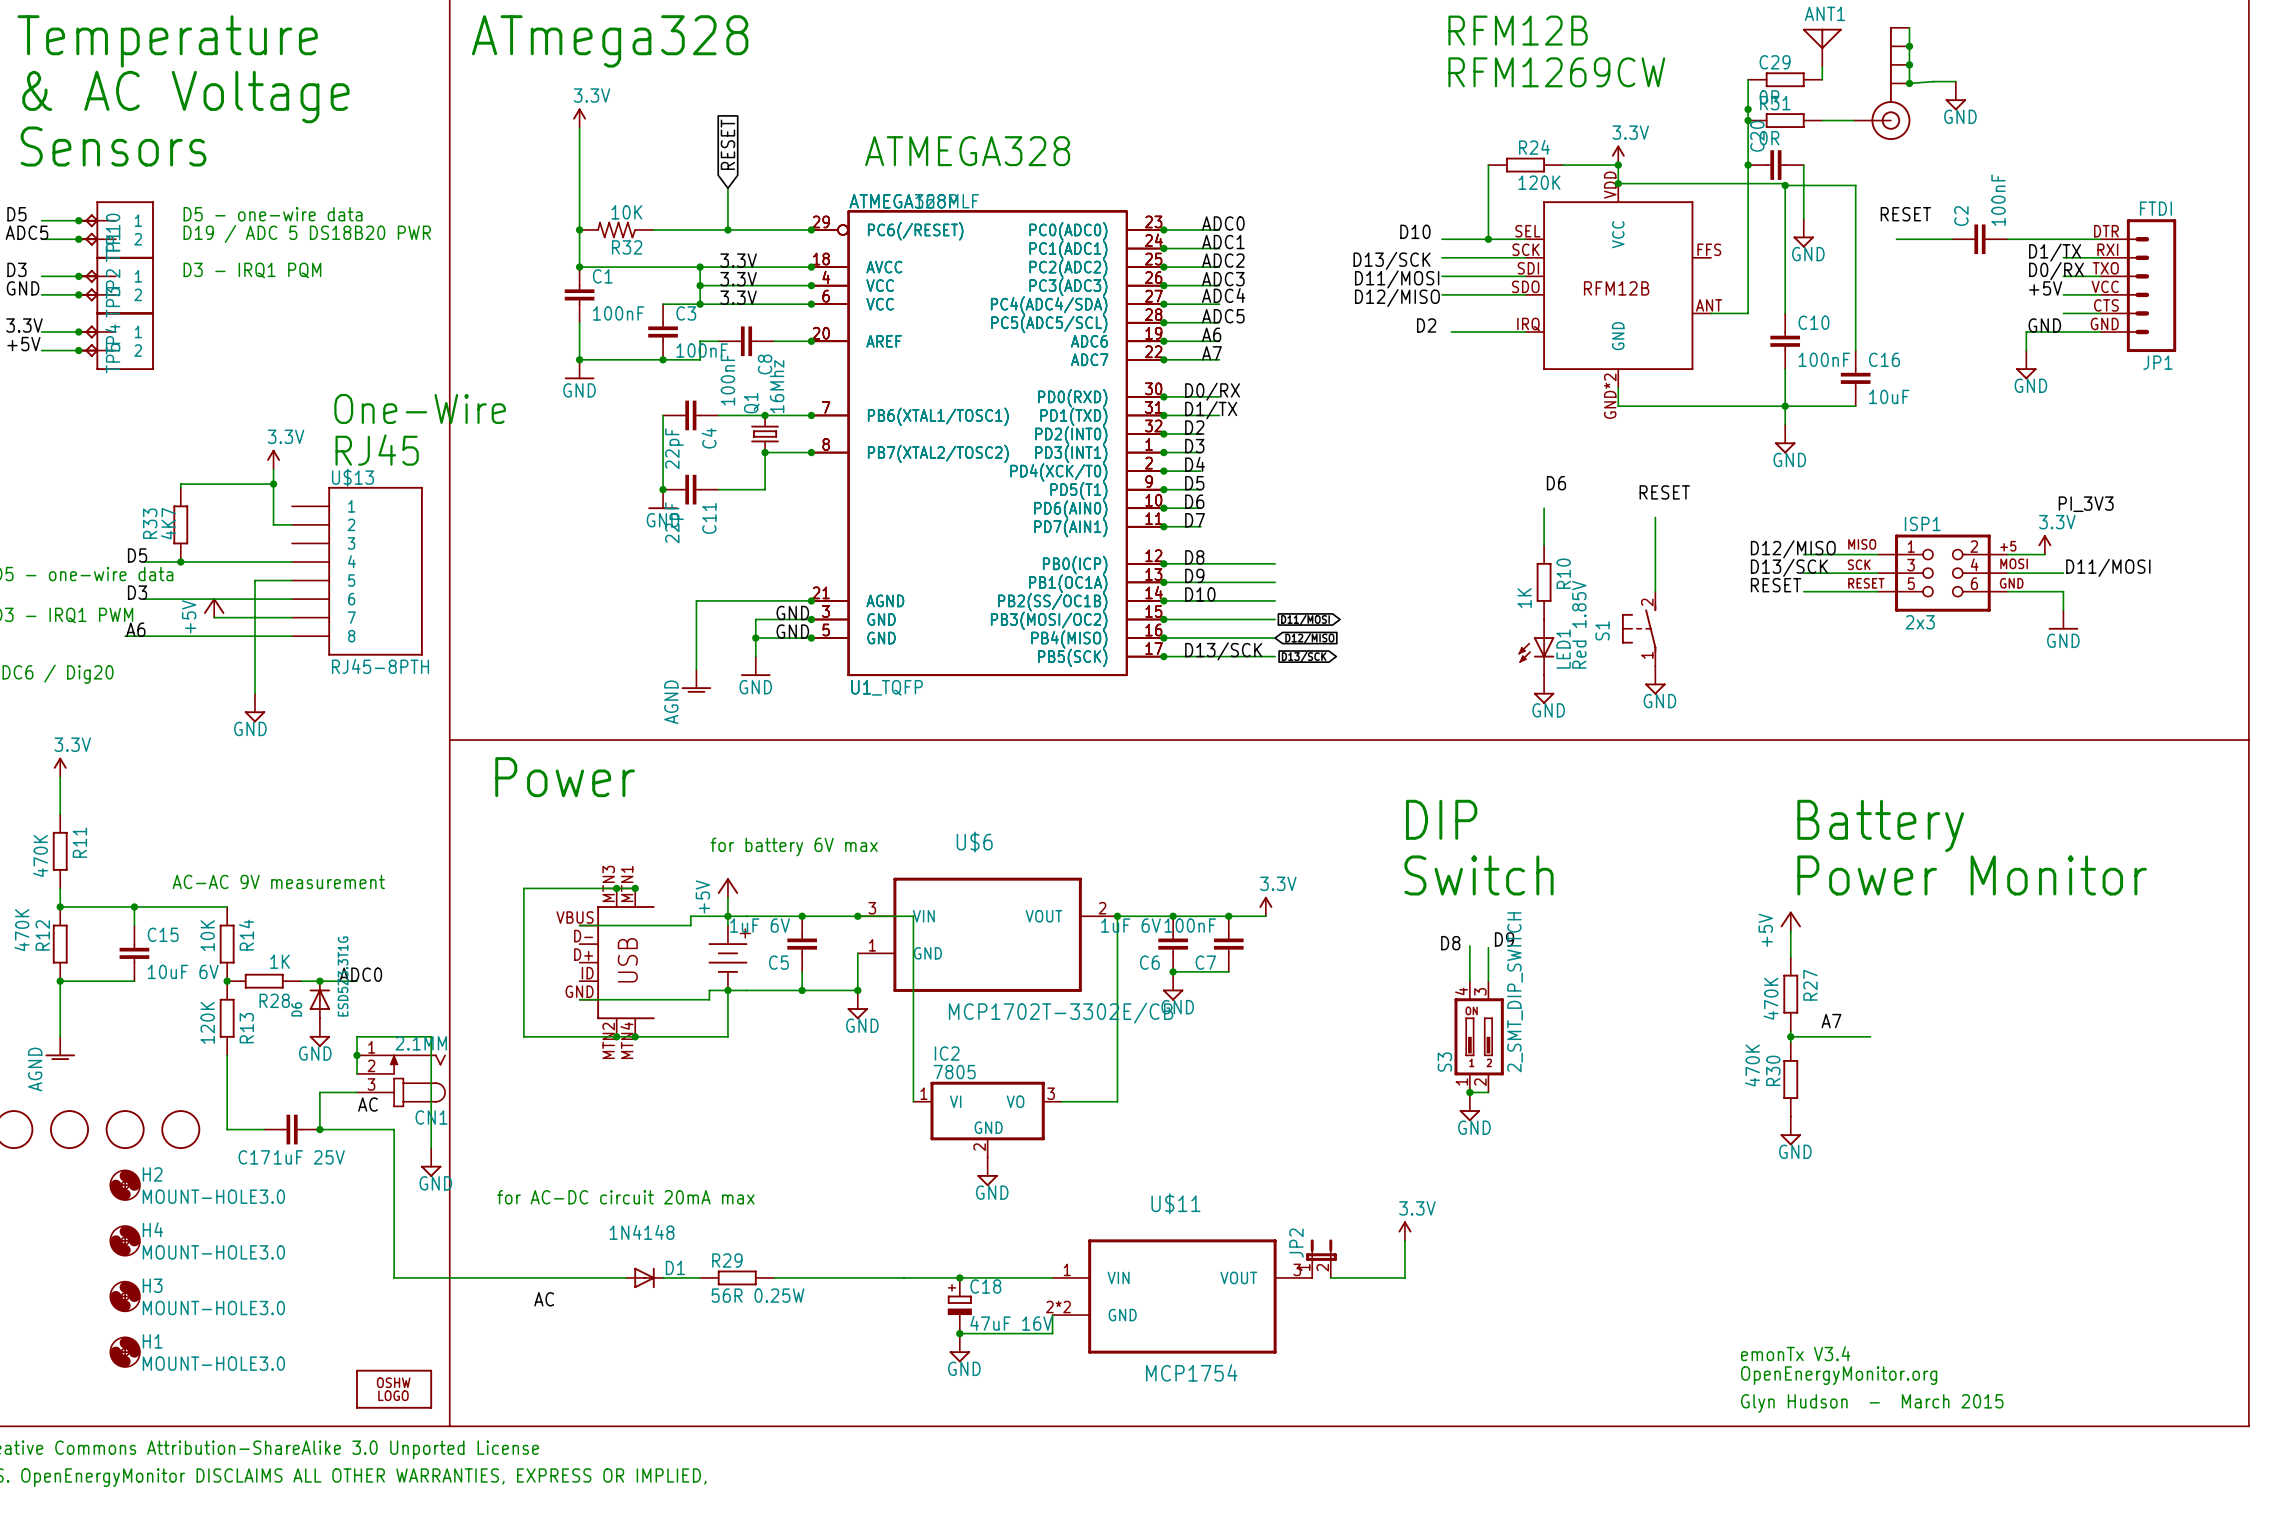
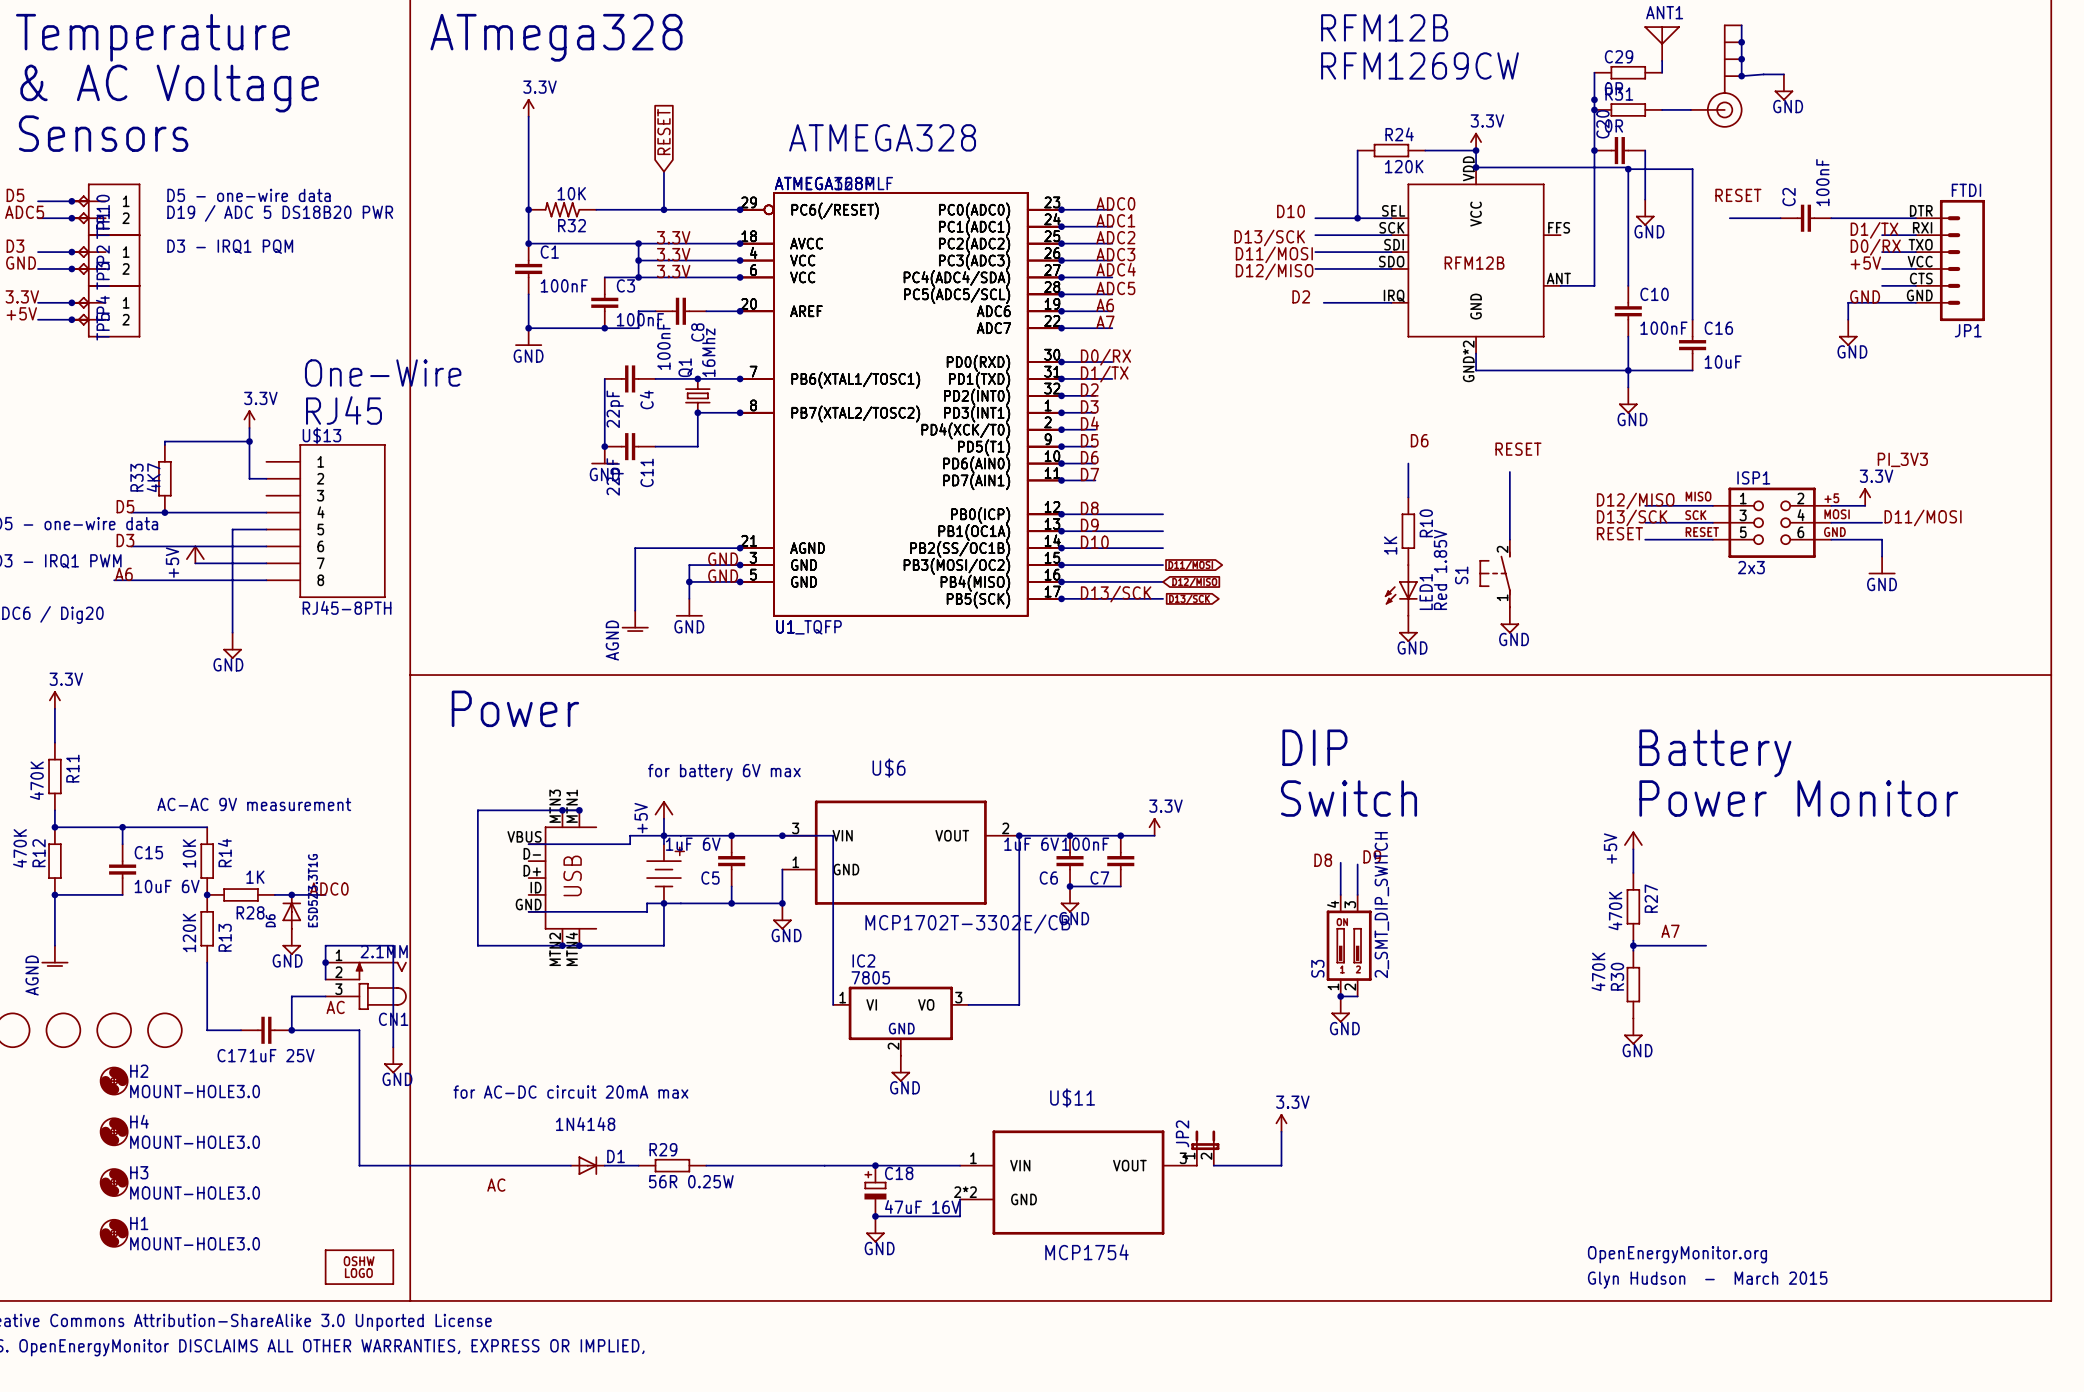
text: emonTx V3.4 (1795, 1353) -> none

